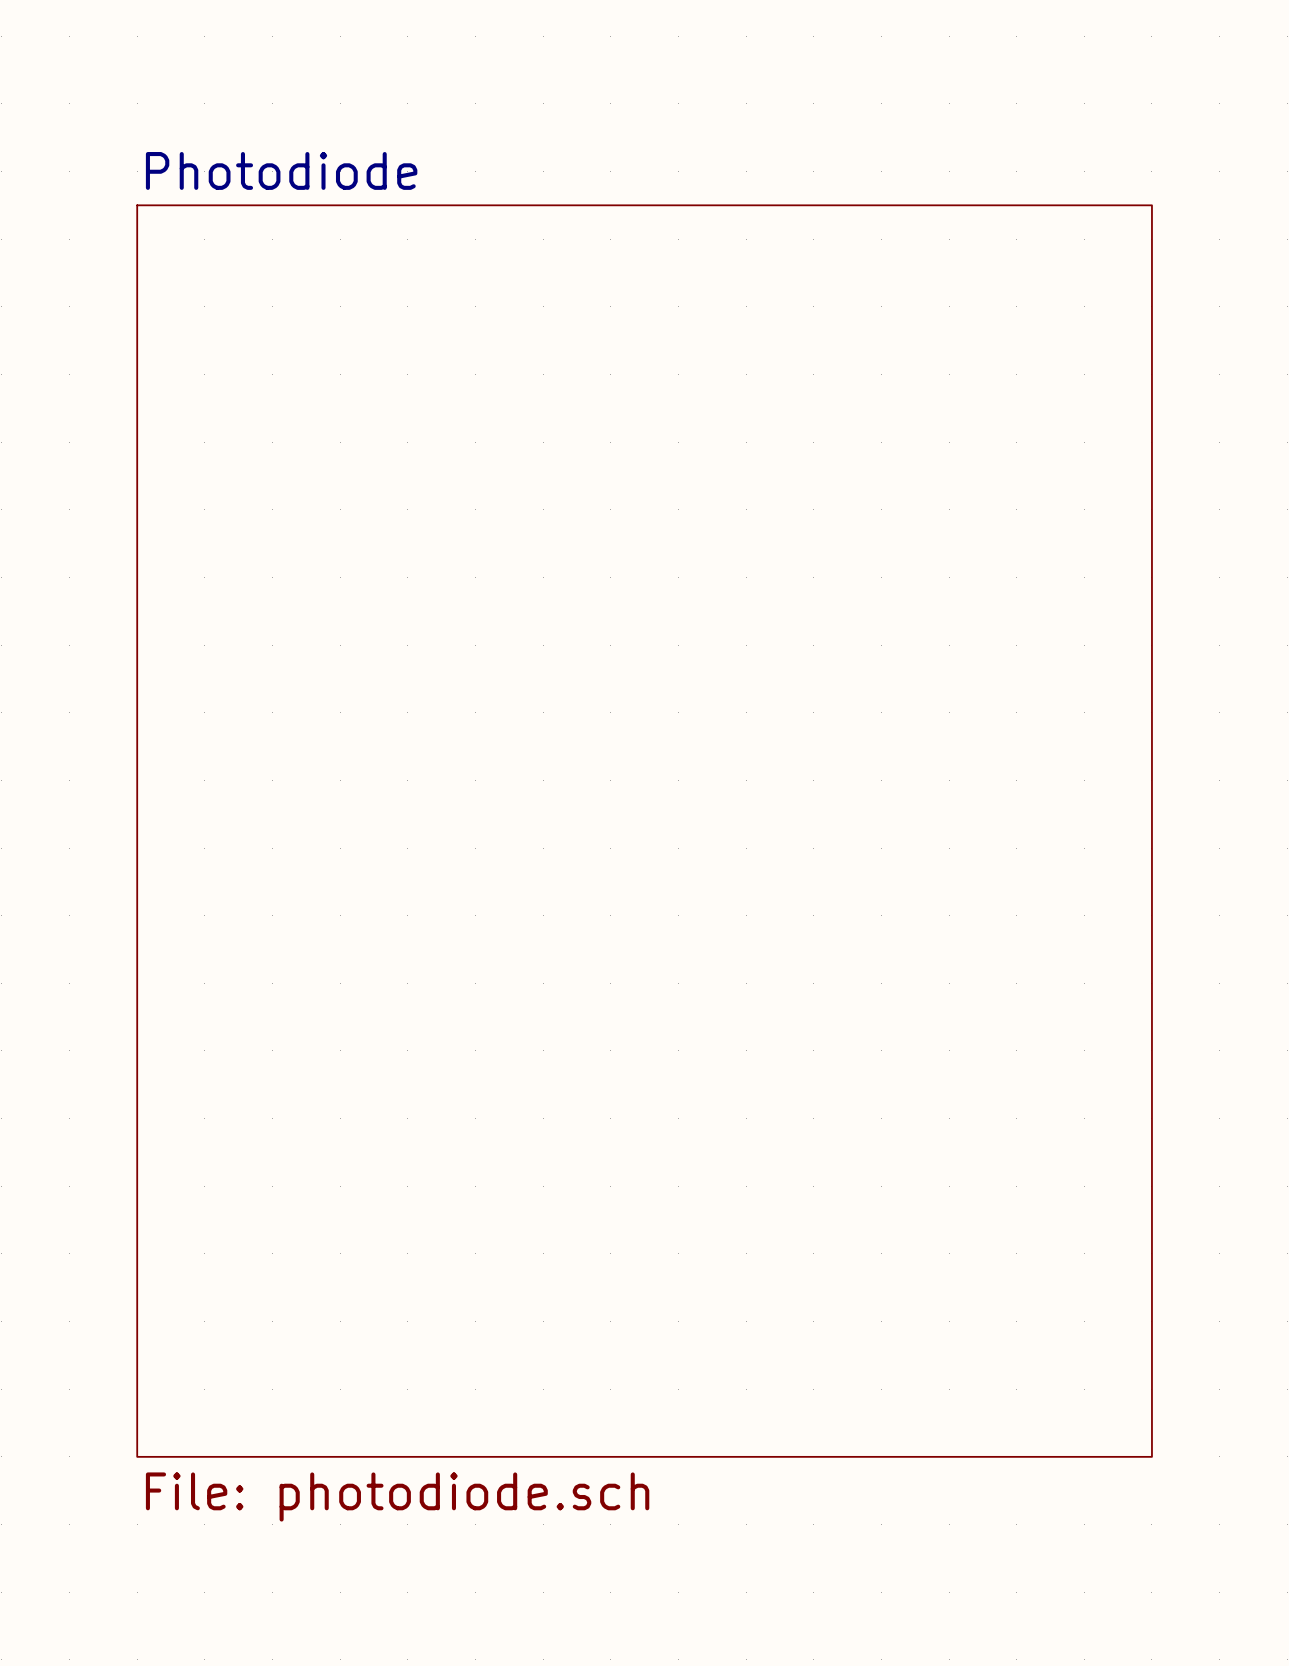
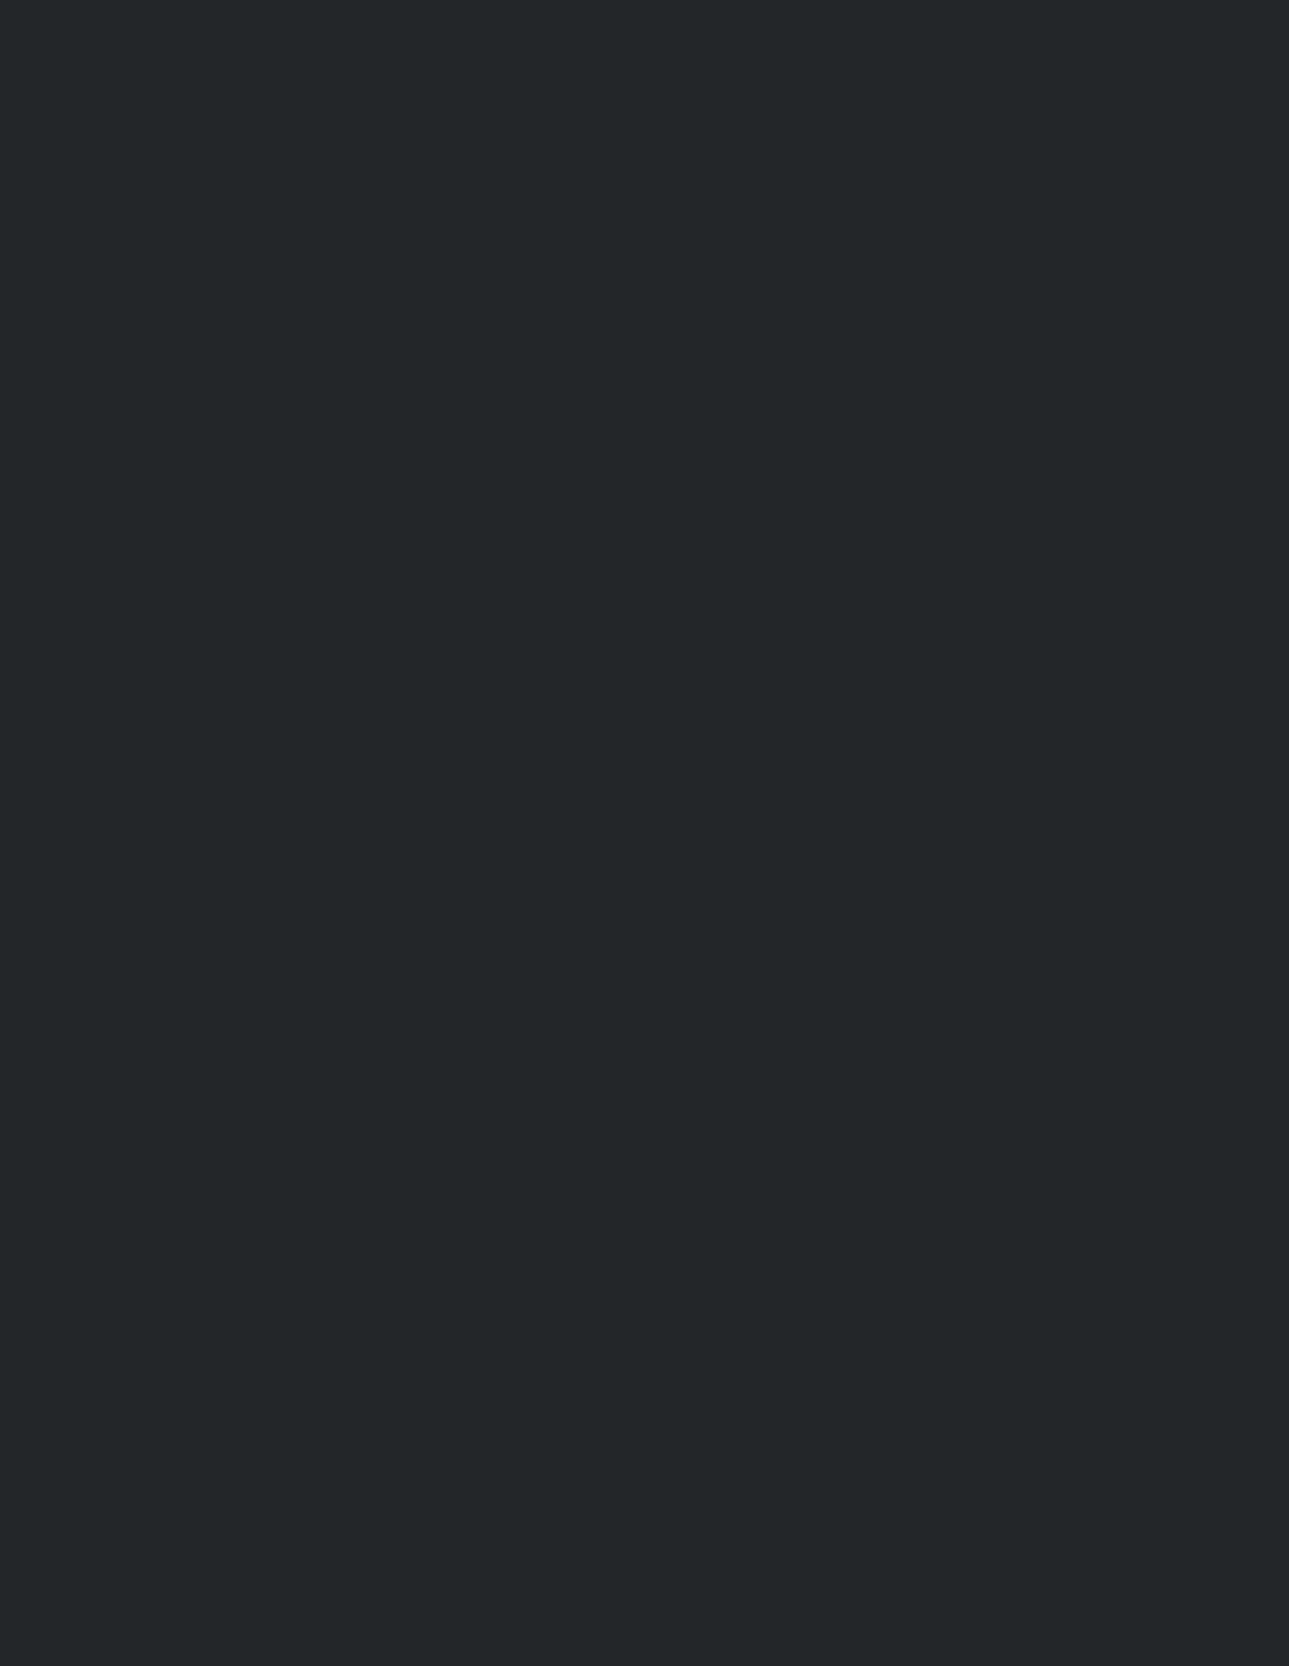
sheet Photodiode: File: photodiode.sch (644, 831) -> none

